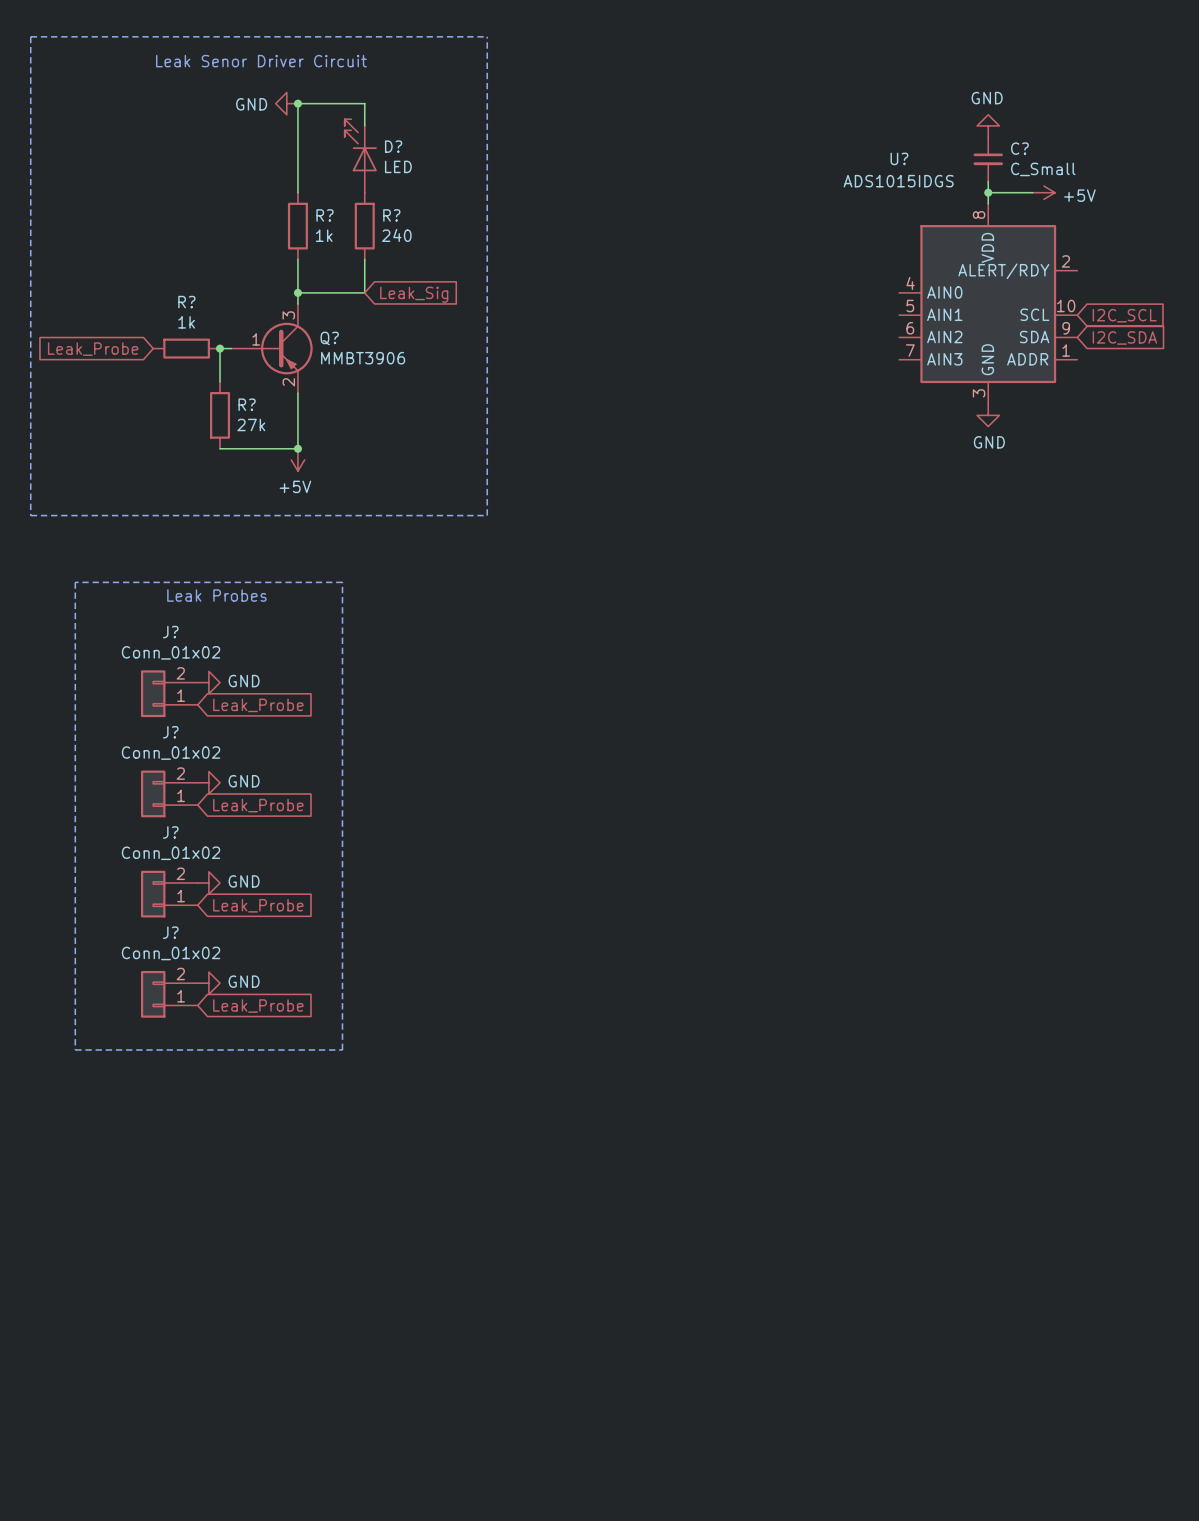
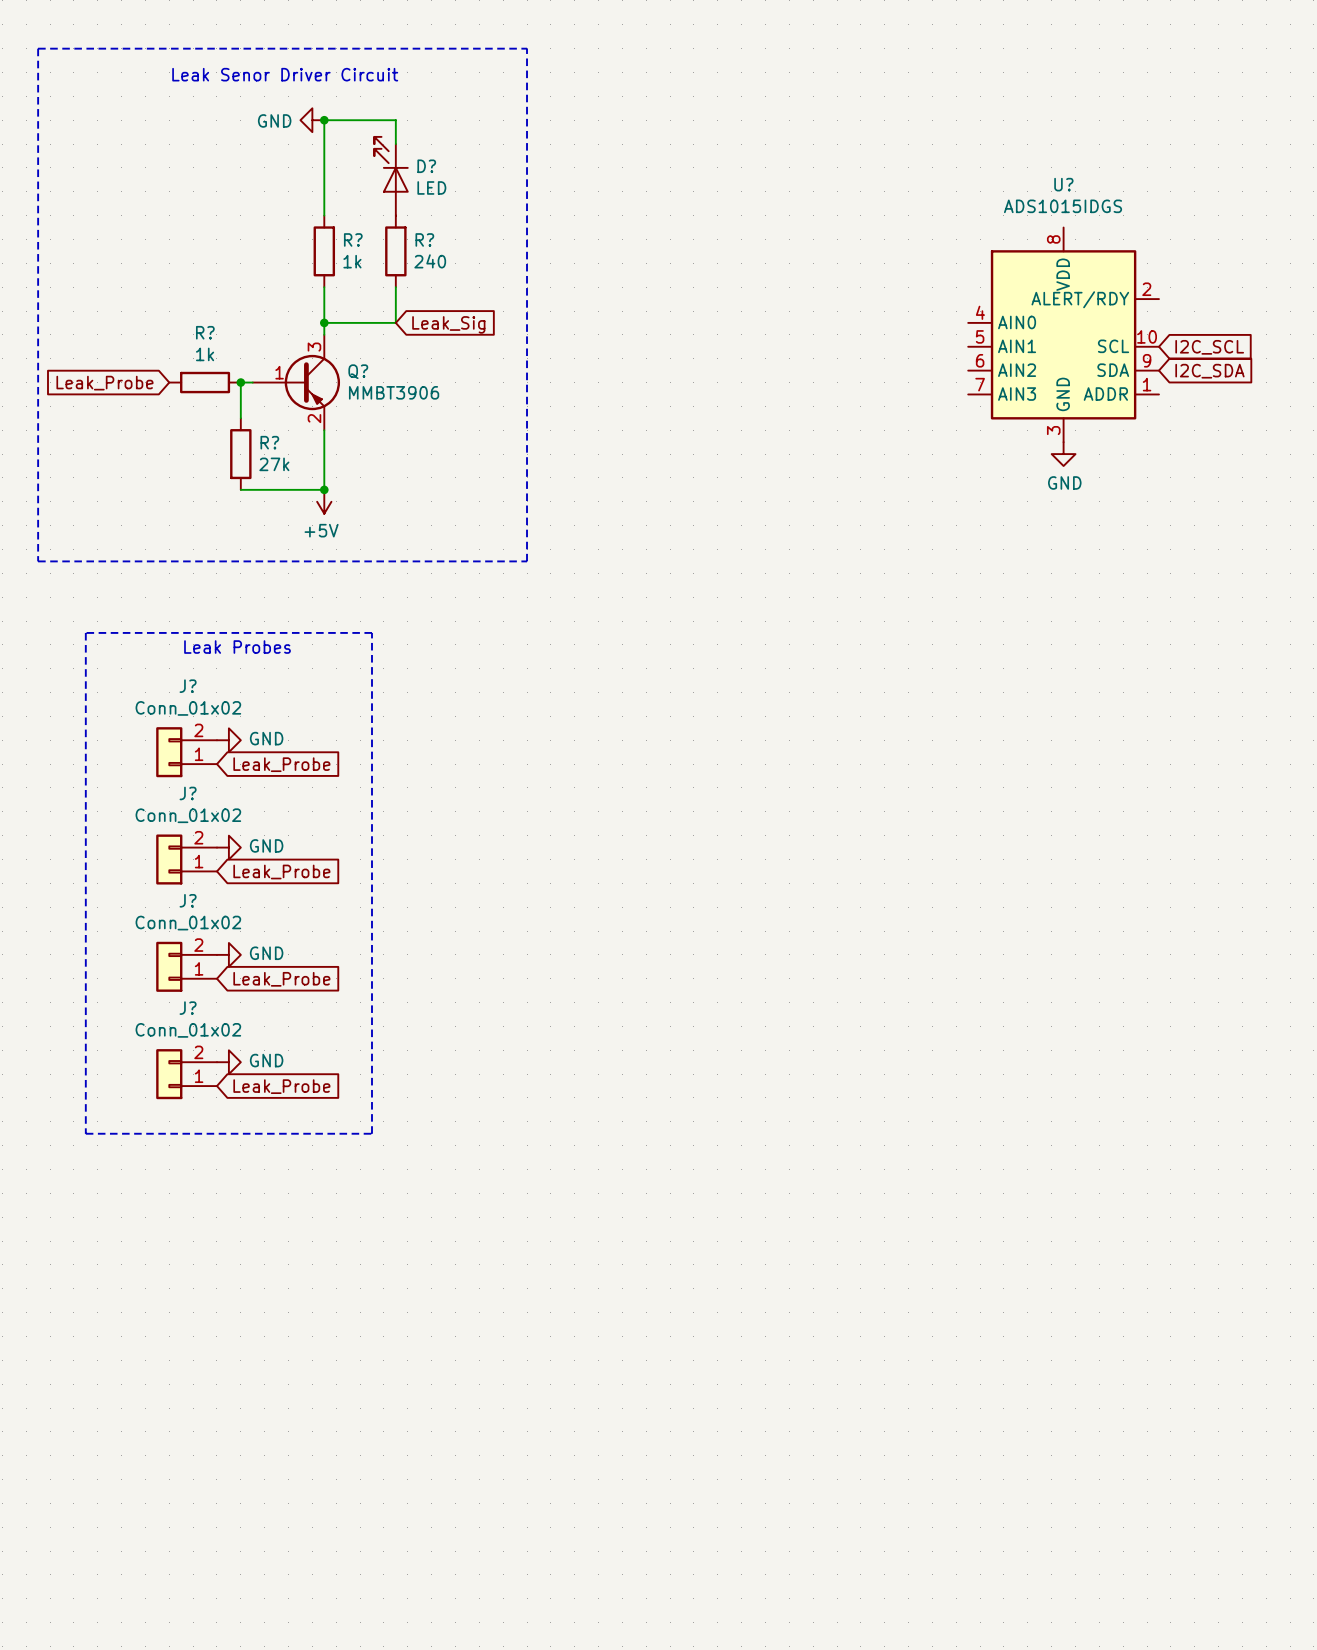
power symbol: GND (988, 125) -> none
U? name position: U? (899, 158) -> U? (1063, 184)
C?: C_Small (988, 159) -> none
U? value position: ADS1015IDGS (898, 181) -> ADS1015IDGS (1063, 206)
wire: (988, 181) (988, 203) -> none
wire: (988, 192) (1032, 192) -> none
junction: (988, 192) -> none
power symbol: +5V (1043, 192) -> none

